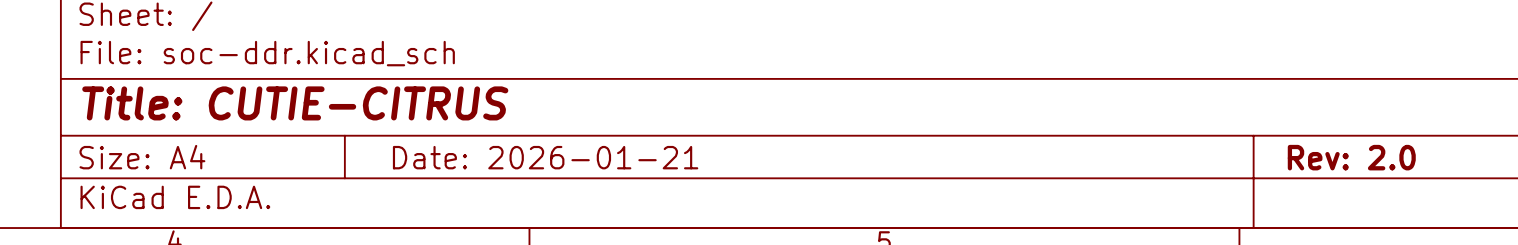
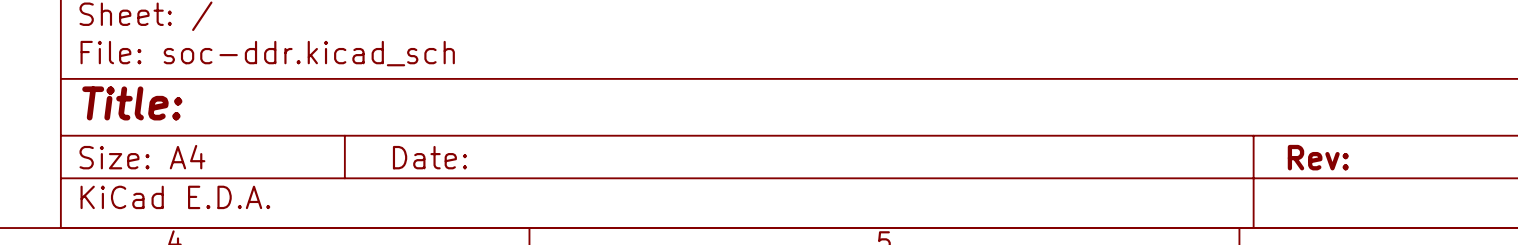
title block: Title: CUTIE-CITRUS (295, 103) -> Title: (132, 103)
title block: Date: 2026-01-21 (545, 157) -> Date: (429, 157)
title block: Rev: 2.0 (1351, 157) -> Rev: (1318, 157)

